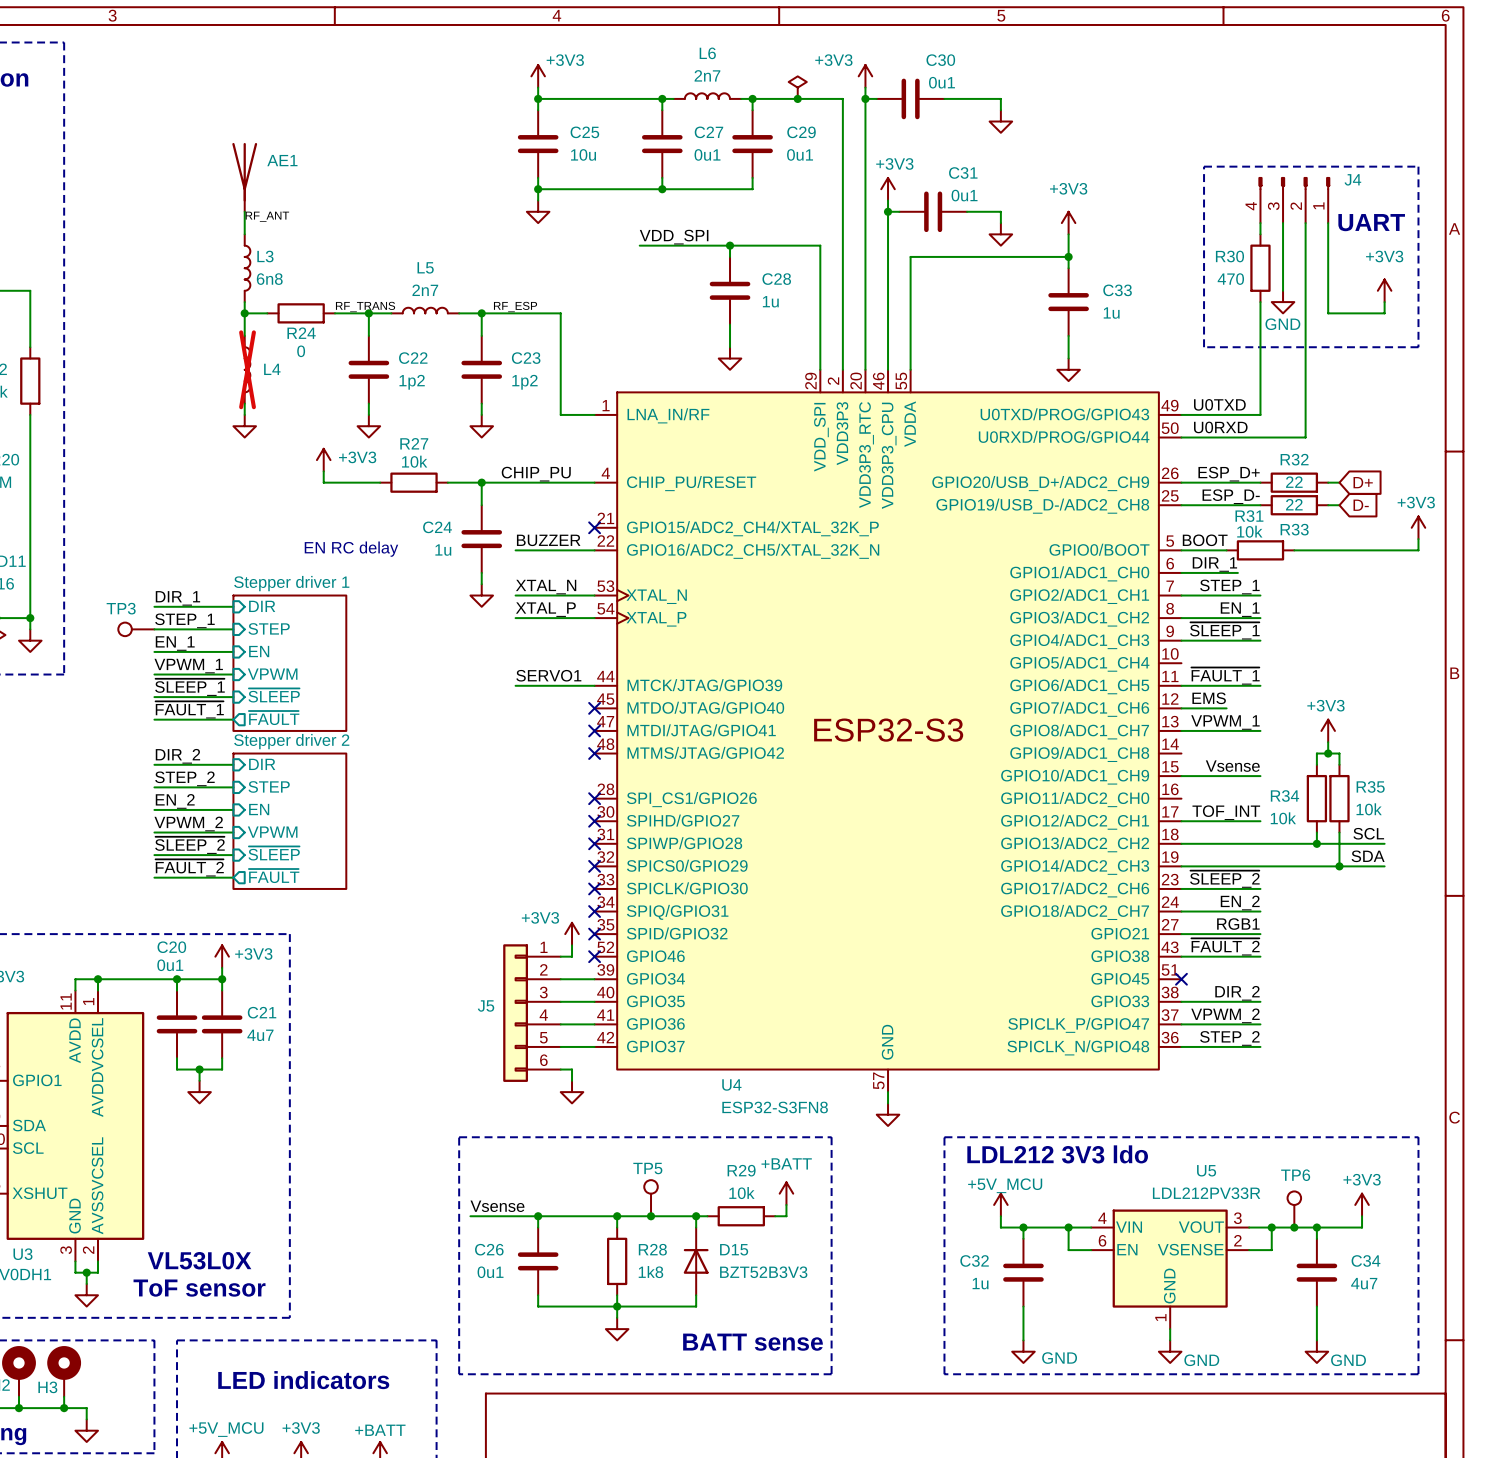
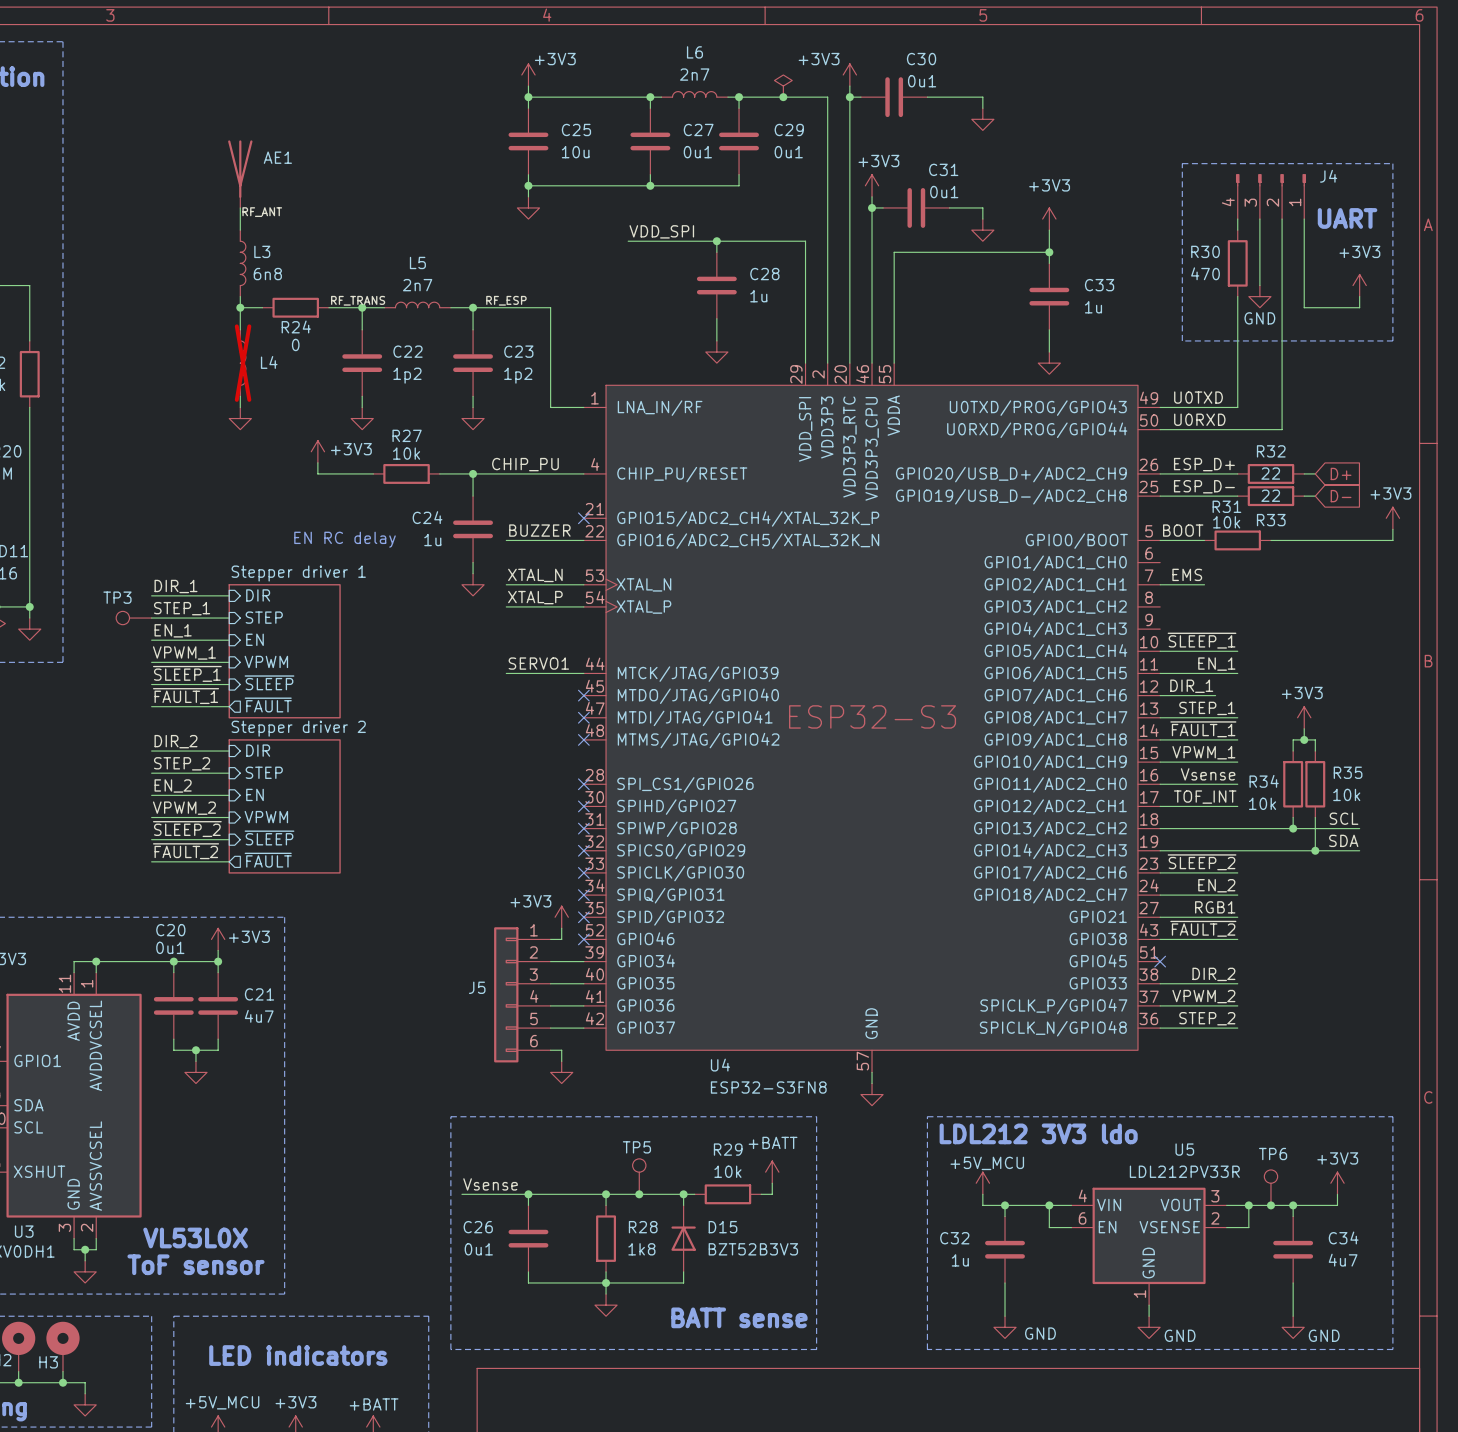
label position: DIR_1 (1214, 564) -> DIR_1 (1191, 686)
wire: (1181, 572) (1237, 572) -> none
label: STEP_1 (1229, 586) -> none
wire: (1226, 595) (1260, 595) -> none
label: EN_1 (1240, 609) -> none
wire: (1181, 618) (1260, 618) -> (1160, 739) (1237, 739)
label position: ~{SLEEP_1} (1224, 630) -> ~{SLEEP_1} (1202, 640)
wire: (1181, 640) (1260, 640) -> (1160, 651) (1237, 651)
label: ~{FAULT_1} (1225, 676) -> EN_1 (1216, 664)
label position: EMS (1209, 698) -> EMS (1187, 574)
wire: none -> (1204, 695) (1215, 695)
label: VPWM_1 (1225, 722) -> STEP_1 (1207, 708)
label: none -> ~{FAULT_1} (1203, 729)
label: Vsense (1232, 766) -> VPWM_1 (1203, 752)
label: none -> Vsense (1208, 774)
wire: none -> (1160, 784) (1237, 784)

